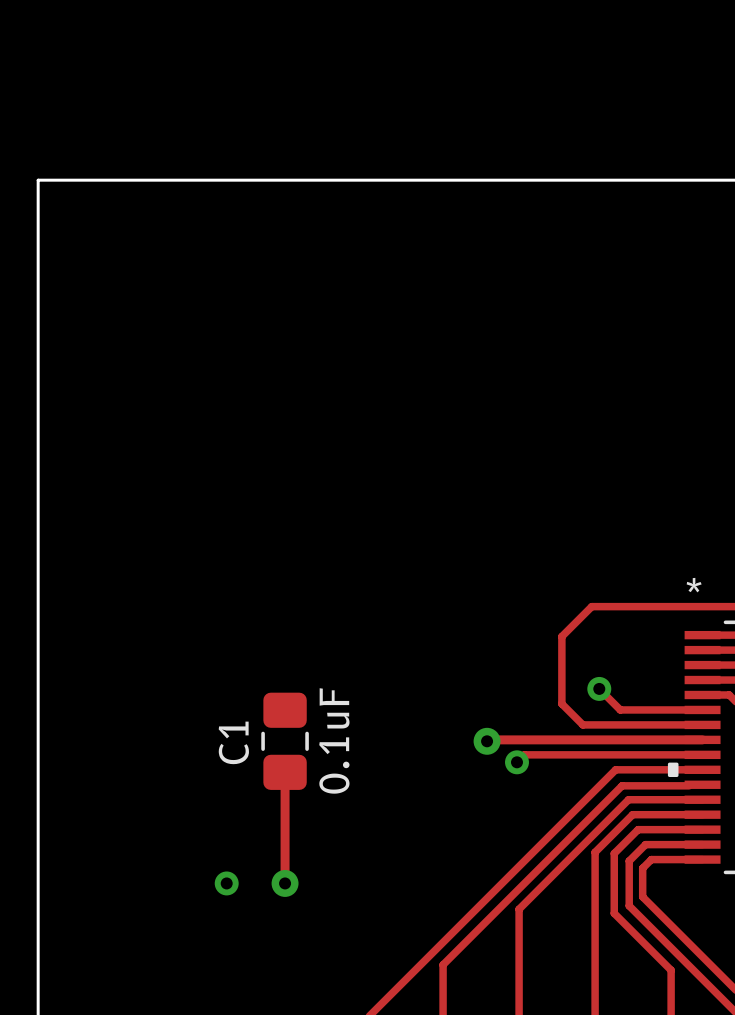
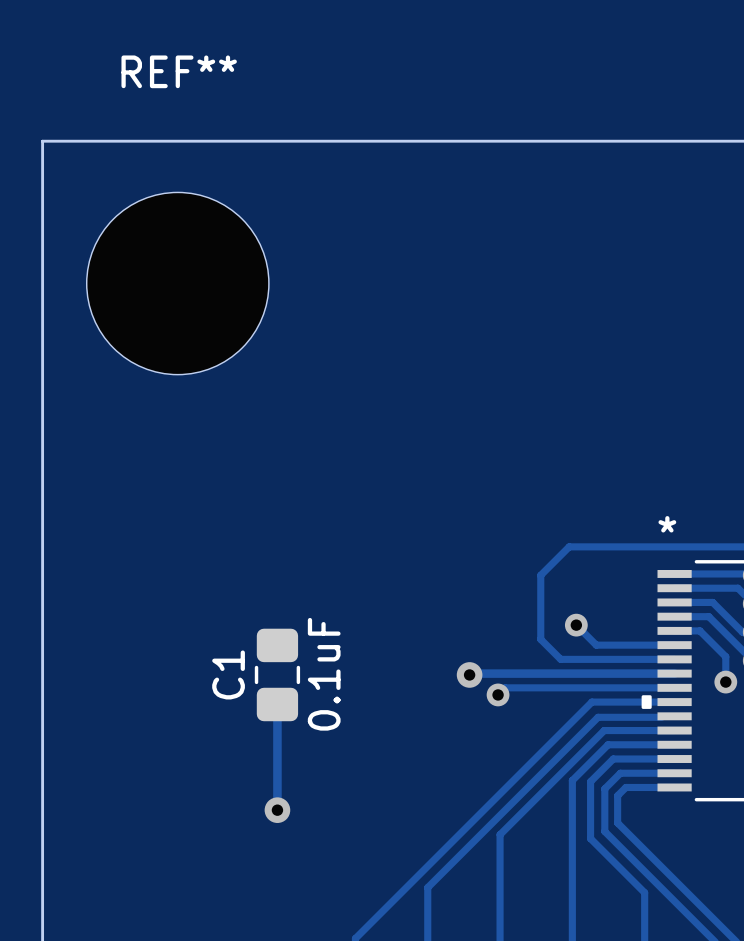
REF**: none -> (177, 283)
via: (226, 883) -> none

